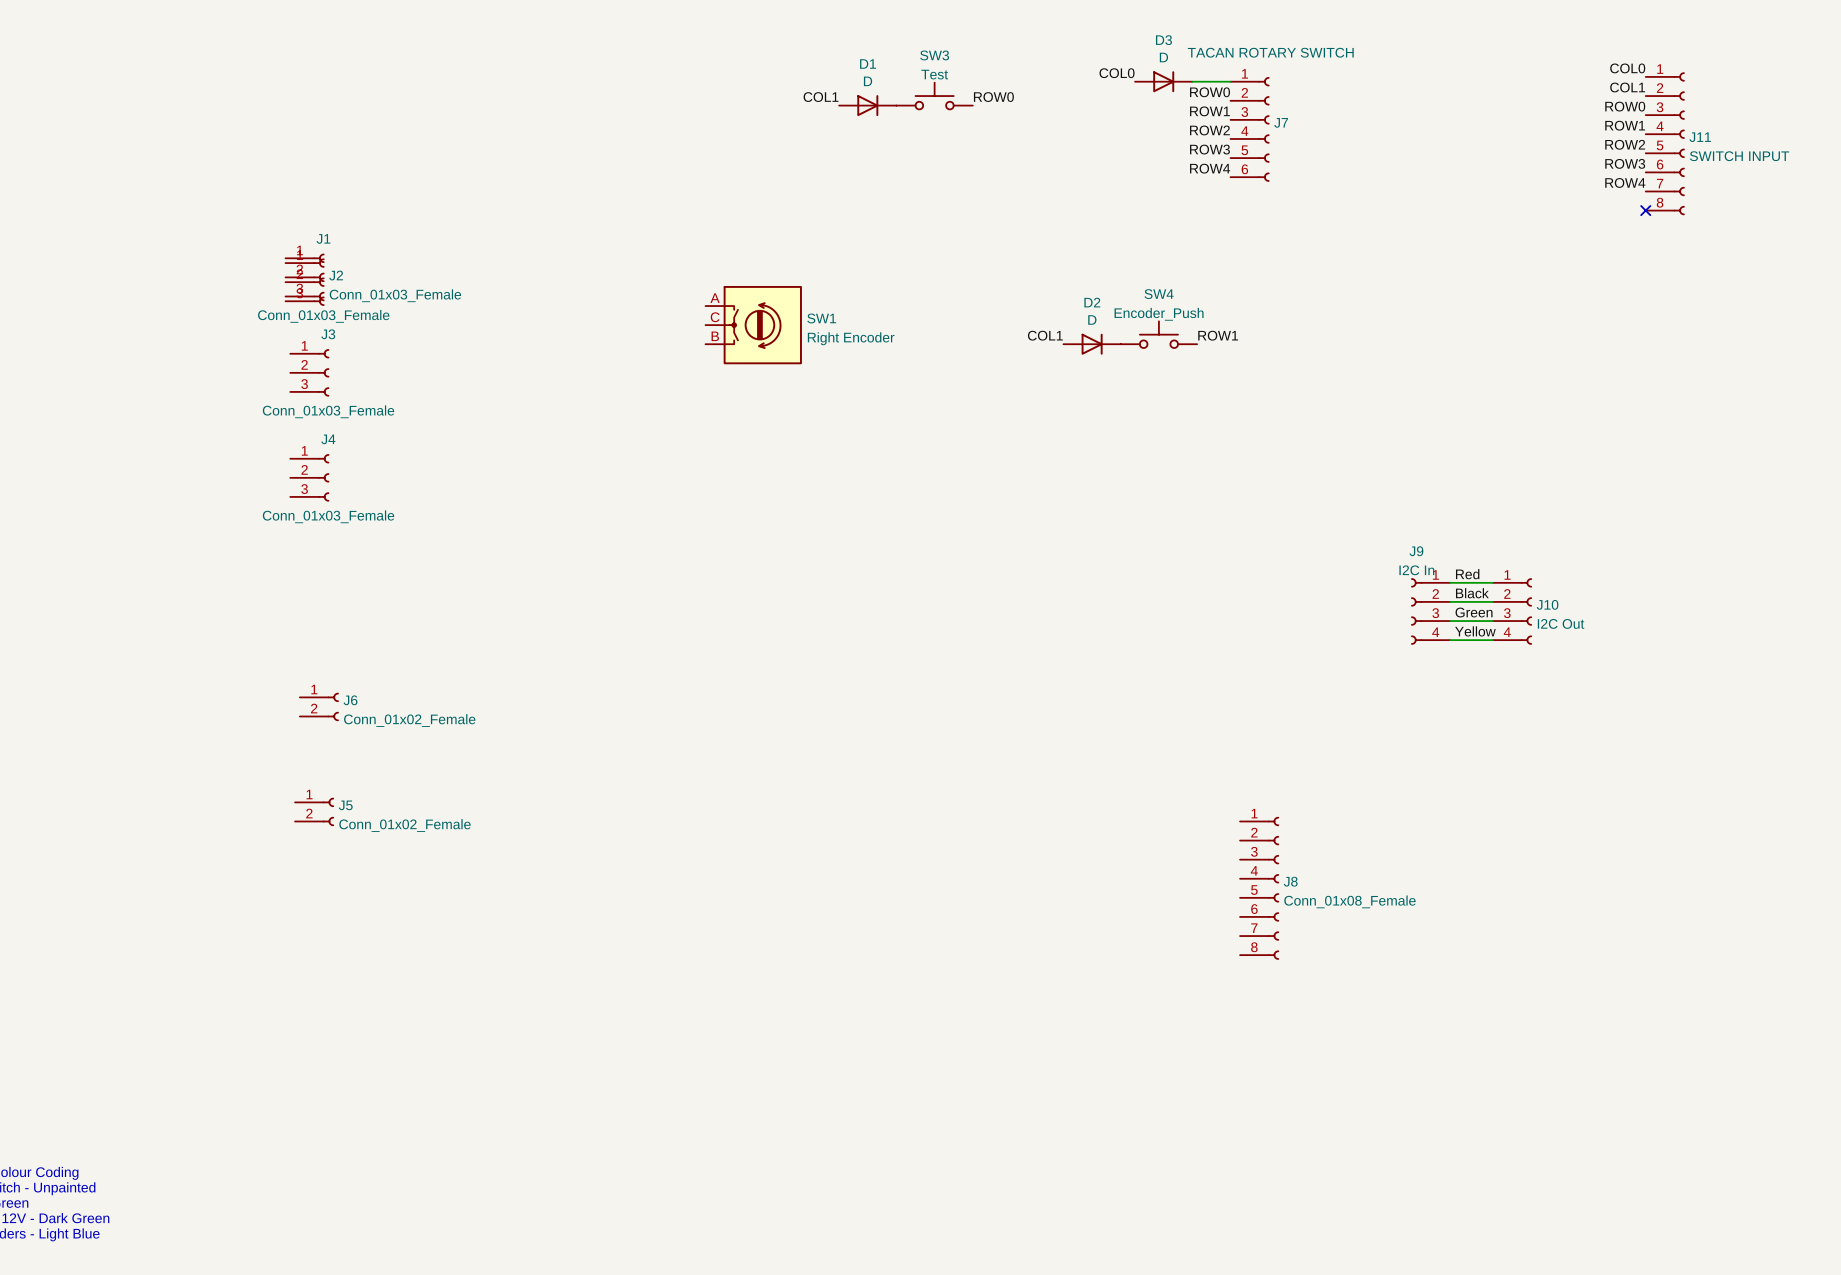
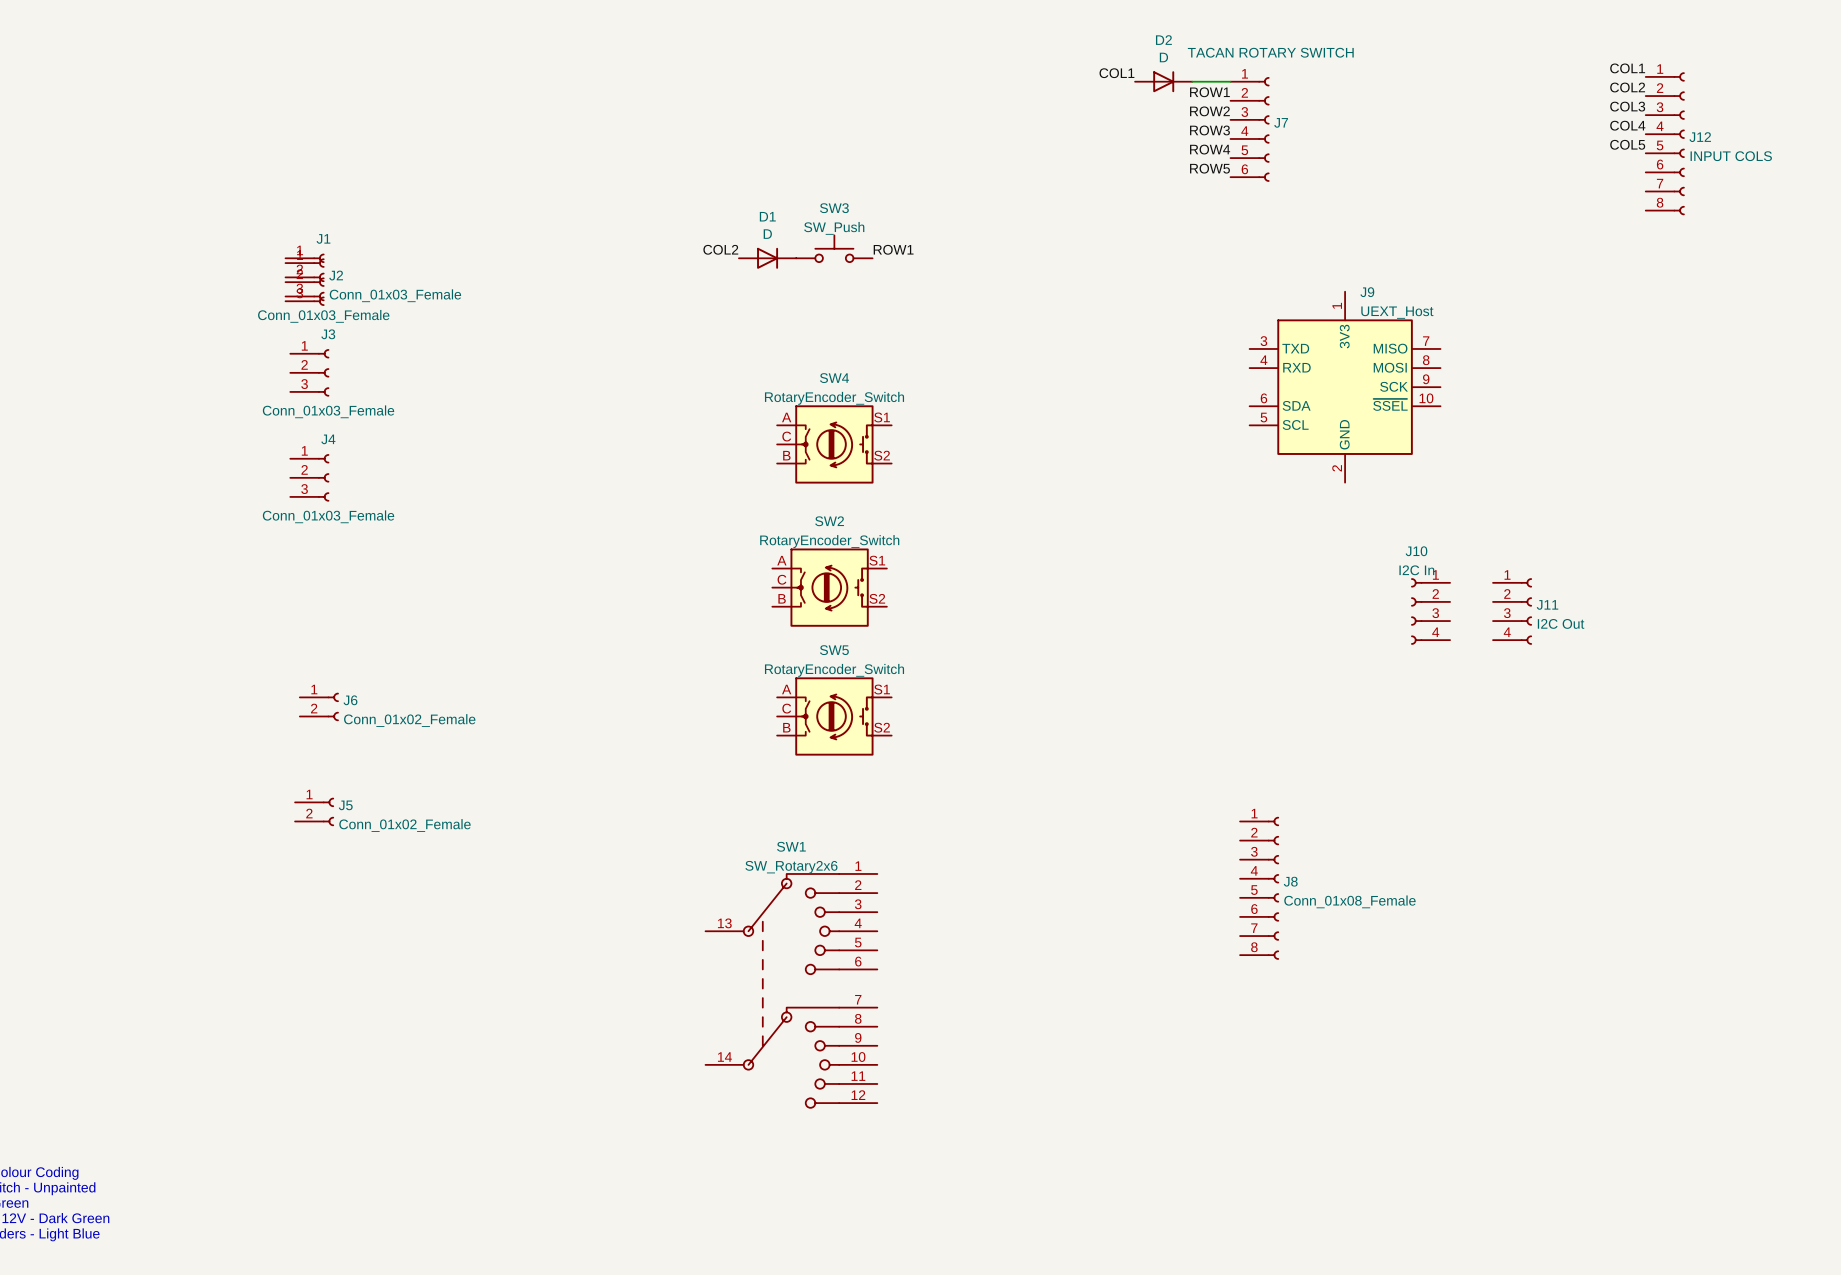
D3 name: D3 (1163, 40) -> D2 (1163, 40)
label: COL0 (1627, 68) -> COL1 (1627, 68)
label: COL0 (1117, 73) -> COL1 (1116, 73)
SW3 value: Test (934, 74) -> SW_Push (834, 228)
label: COL1 (1627, 87) -> COL2 (1627, 87)
label: ROW0 (1210, 92) -> ROW1 (1209, 92)
SW3 position: (934, 96) -> (834, 248)
label: COL1 (821, 97) -> none
label: ROW0 (993, 97) -> none
D1 position: (867, 105) -> (767, 258)
label: ROW0 (1625, 106) -> COL3 (1627, 106)
label: ROW1 (1209, 111) -> ROW2 (1209, 111)
label: ROW1 (1625, 125) -> COL4 (1627, 125)
label: ROW2 (1209, 130) -> ROW3 (1209, 130)
J11 name: J11 (1700, 137) -> J12 (1700, 137)
label: ROW2 (1625, 144) -> COL5 (1627, 144)
label: ROW3 (1209, 149) -> ROW4 (1210, 149)
J11 value: SWITCH INPUT (1739, 156) -> INPUT COLS (1731, 156)
label: ROW3 (1625, 163) -> none
label: ROW4 (1210, 168) -> ROW5 (1209, 168)
label: ROW4 (1625, 182) -> none
no-connect mark: (1645, 210) -> none
label: none -> COL2 (720, 249)
label: none -> ROW1 (893, 249)
SW1 symbol: [705, 285, 802, 365] -> [705, 873, 878, 1108]
SW4 name position: SW4 (1159, 294) -> SW4 (834, 378)
SW4 value: Encoder_Push (1159, 314) -> RotaryEncoder_Switch (834, 398)
SW1 name position: SW1 (821, 318) -> SW1 (791, 846)
SW4 symbol: [1120, 321, 1198, 349] -> [777, 405, 892, 484]
label: COL1 (1045, 335) -> none
label: ROW1 (1218, 335) -> none
SW1 value: Right Encoder (851, 338) -> SW_Rotary2x6 (791, 867)
D2: D (1092, 344) -> none
J9: none -> UEXT_Host (1345, 387)
J9 name: J9 (1416, 551) -> J10 (1416, 551)
label: Red (1467, 574) -> none
wire: (1450, 582) (1493, 582) -> none
SW2: none -> RotaryEncoder_Switch (829, 587)
label: Black (1472, 593) -> none
wire: (1450, 601) (1493, 601) -> none
J10 name: J10 (1547, 604) -> J11 (1547, 604)
label: Green (1474, 612) -> none
wire: (1450, 621) (1493, 621) -> none
label: Yellow (1475, 631) -> none
wire: (1450, 640) (1493, 640) -> none
SW5: none -> RotaryEncoder_Switch (834, 716)

